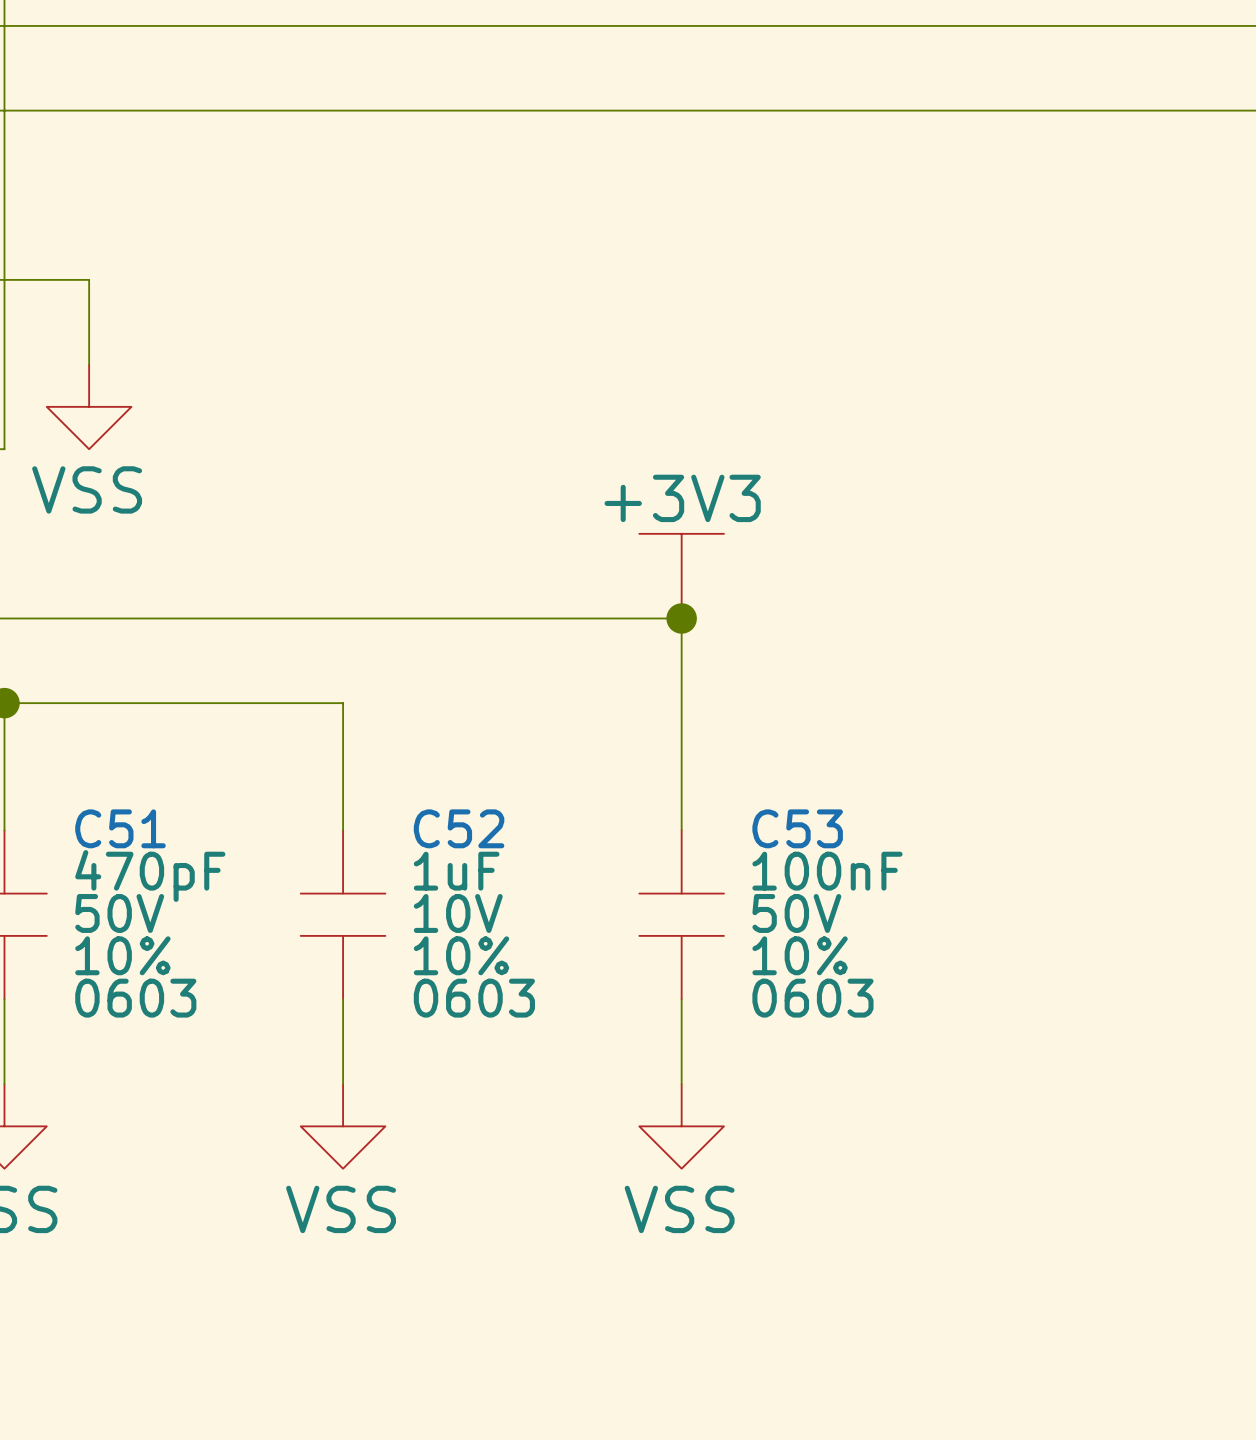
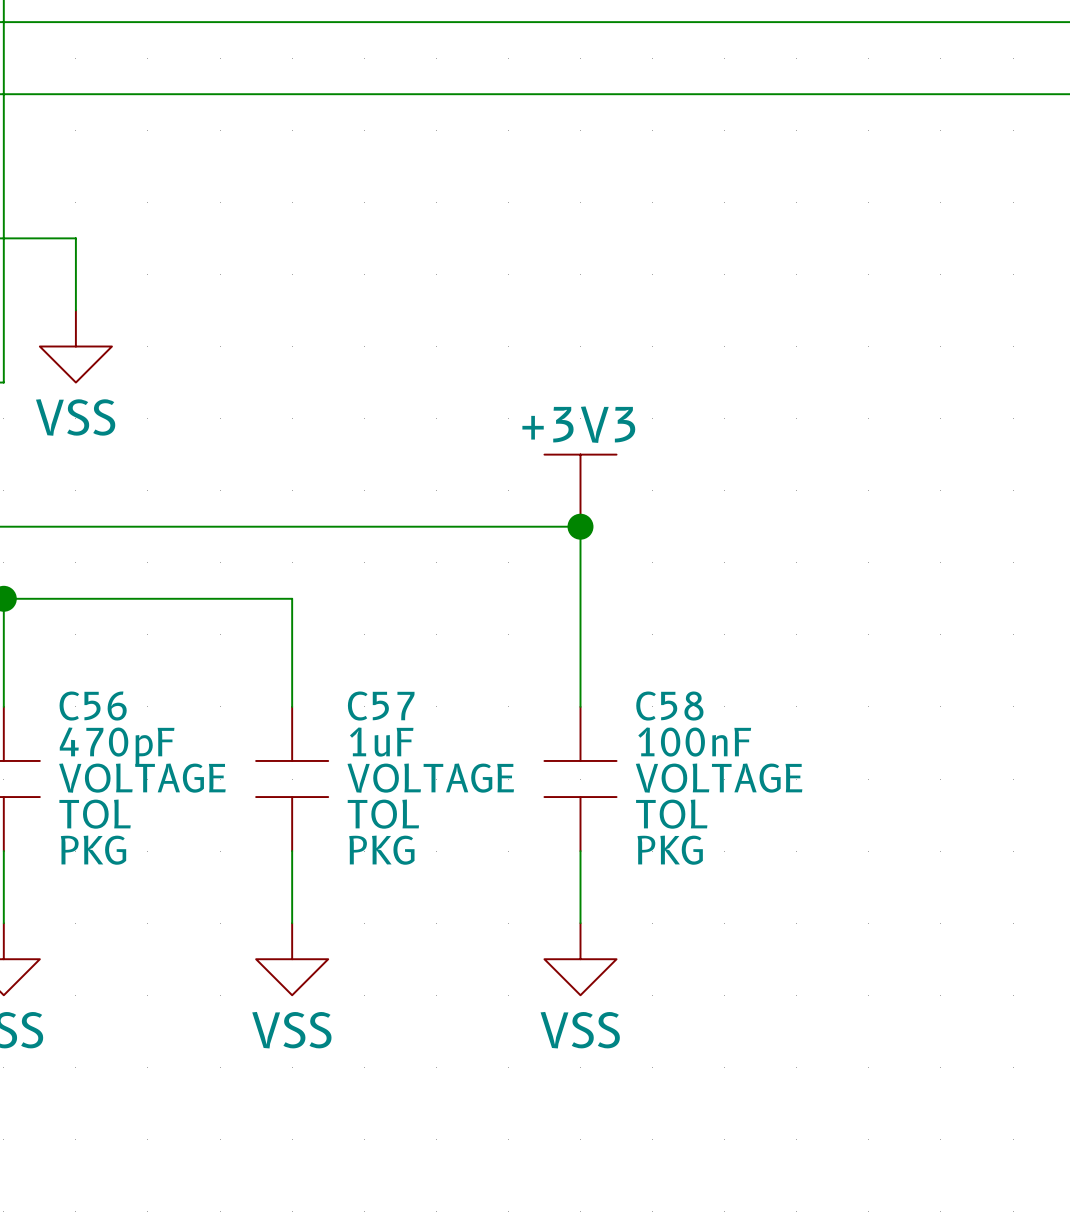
C51 name: C51 (120, 828) -> C56 (93, 706)
C52 name: C52 (459, 828) -> C57 (381, 706)
C53 name: C53 (797, 828) -> C58 (669, 706)
C51 text: 50V (119, 913) -> VOLTAGE (142, 778)
C52 text: 10V (458, 913) -> VOLTAGE (430, 778)
C53 text: 50V (796, 913) -> VOLTAGE (719, 778)
C51 text: 10% (122, 955) -> TOL (95, 814)
C52 text: 10% (461, 955) -> TOL (383, 814)
C53 text: 10% (800, 955) -> TOL (671, 814)
C51 text: 0603 (135, 998) -> PKG (93, 850)
C52 text: 0603 (474, 998) -> PKG (381, 850)
C53 text: 0603 (812, 998) -> PKG (670, 850)

